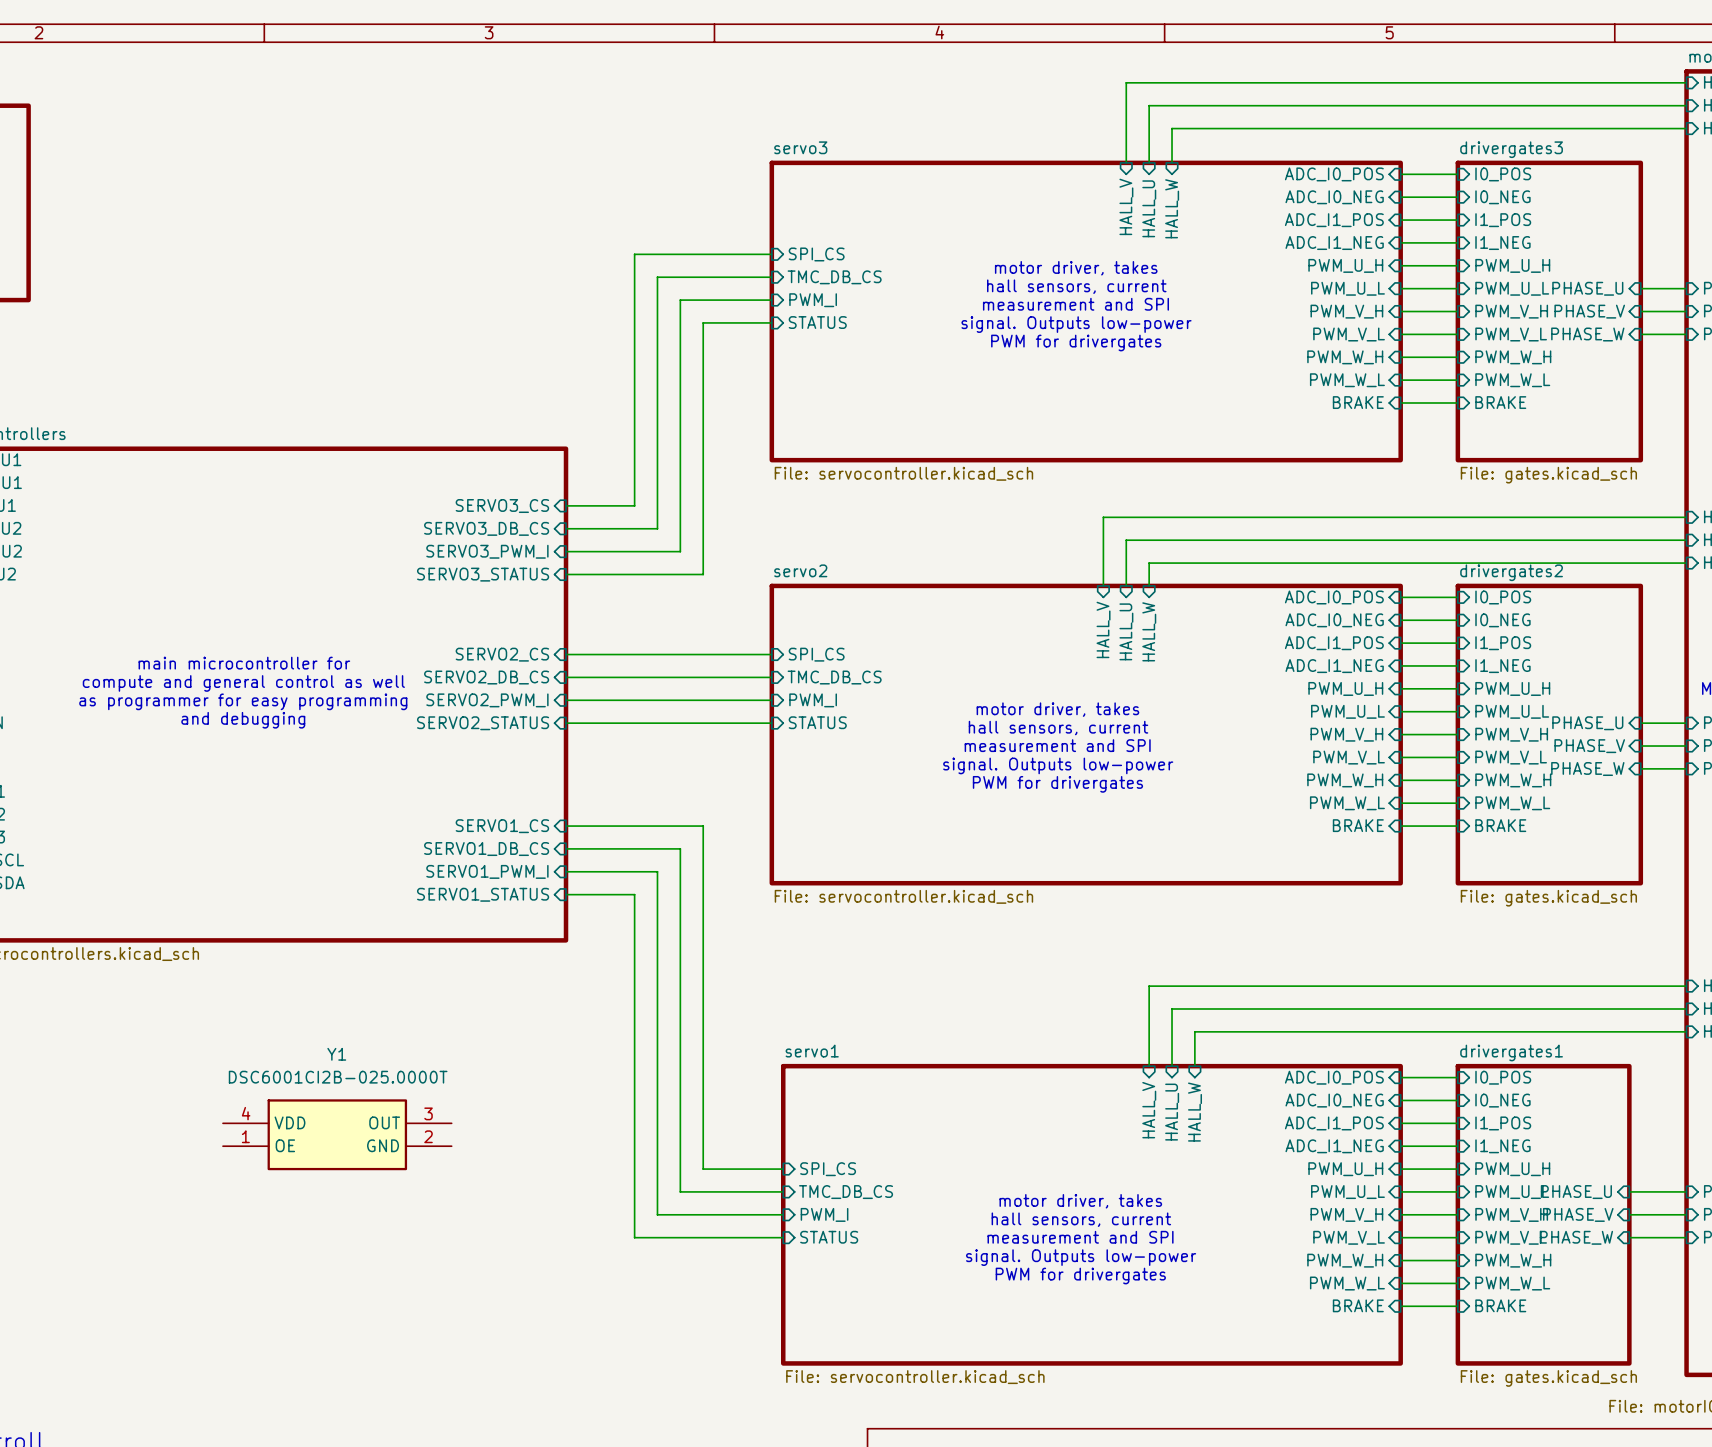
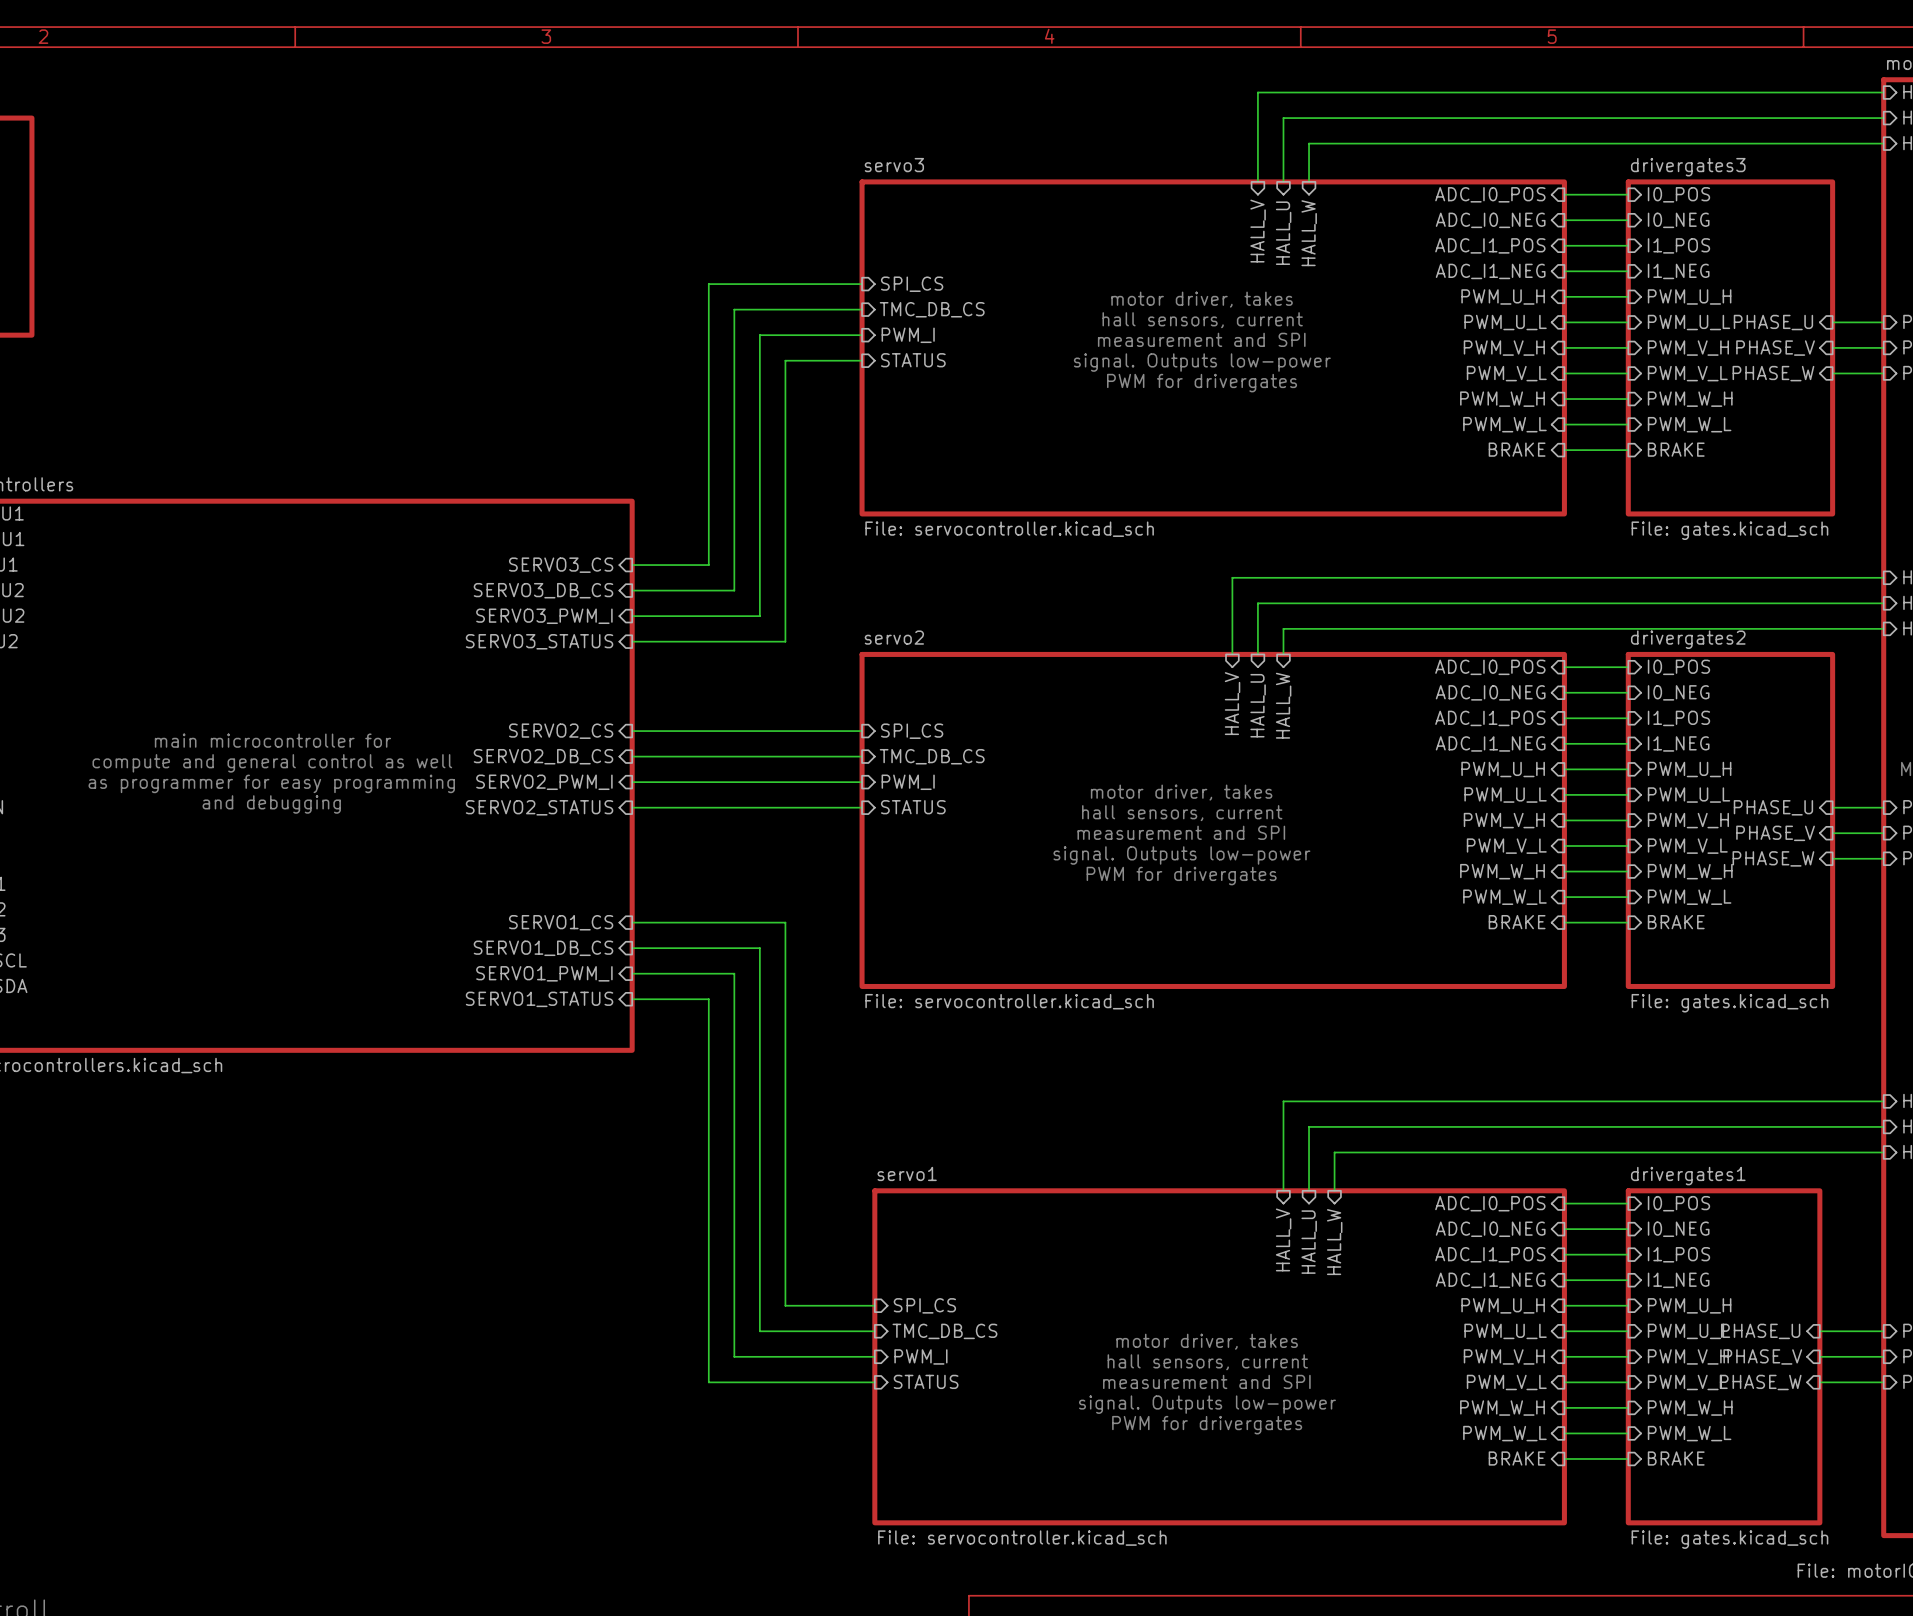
Y1: DSC6001CI2B-025.0000T (337, 1134) -> none

